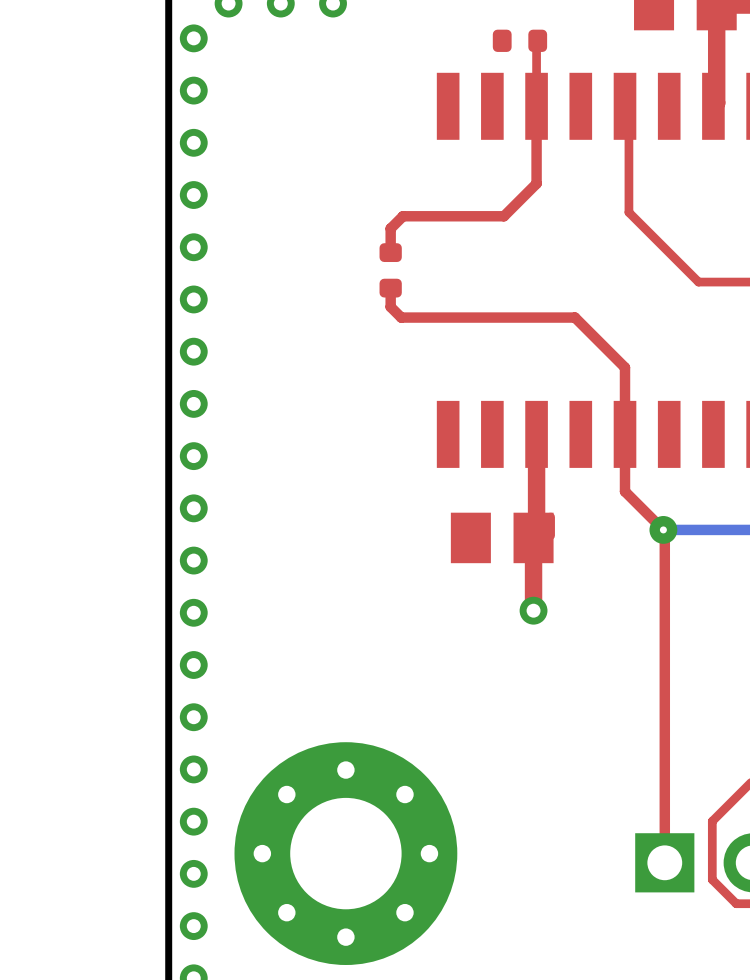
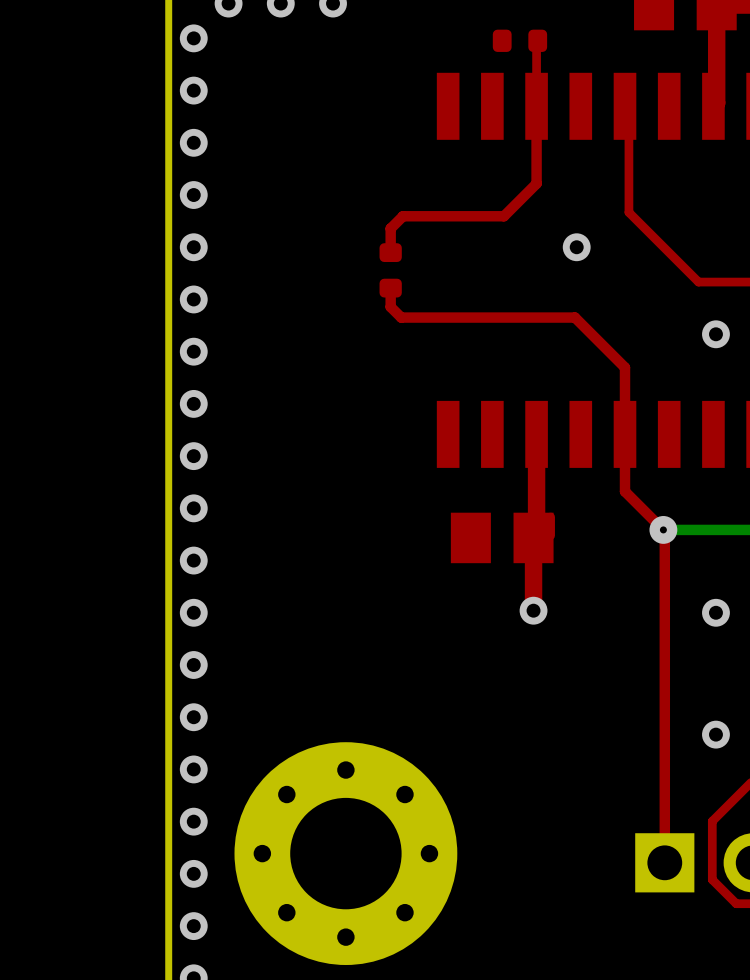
via: none -> (576, 247)
via: none -> (715, 334)
via: none -> (715, 612)
via: none -> (715, 734)

